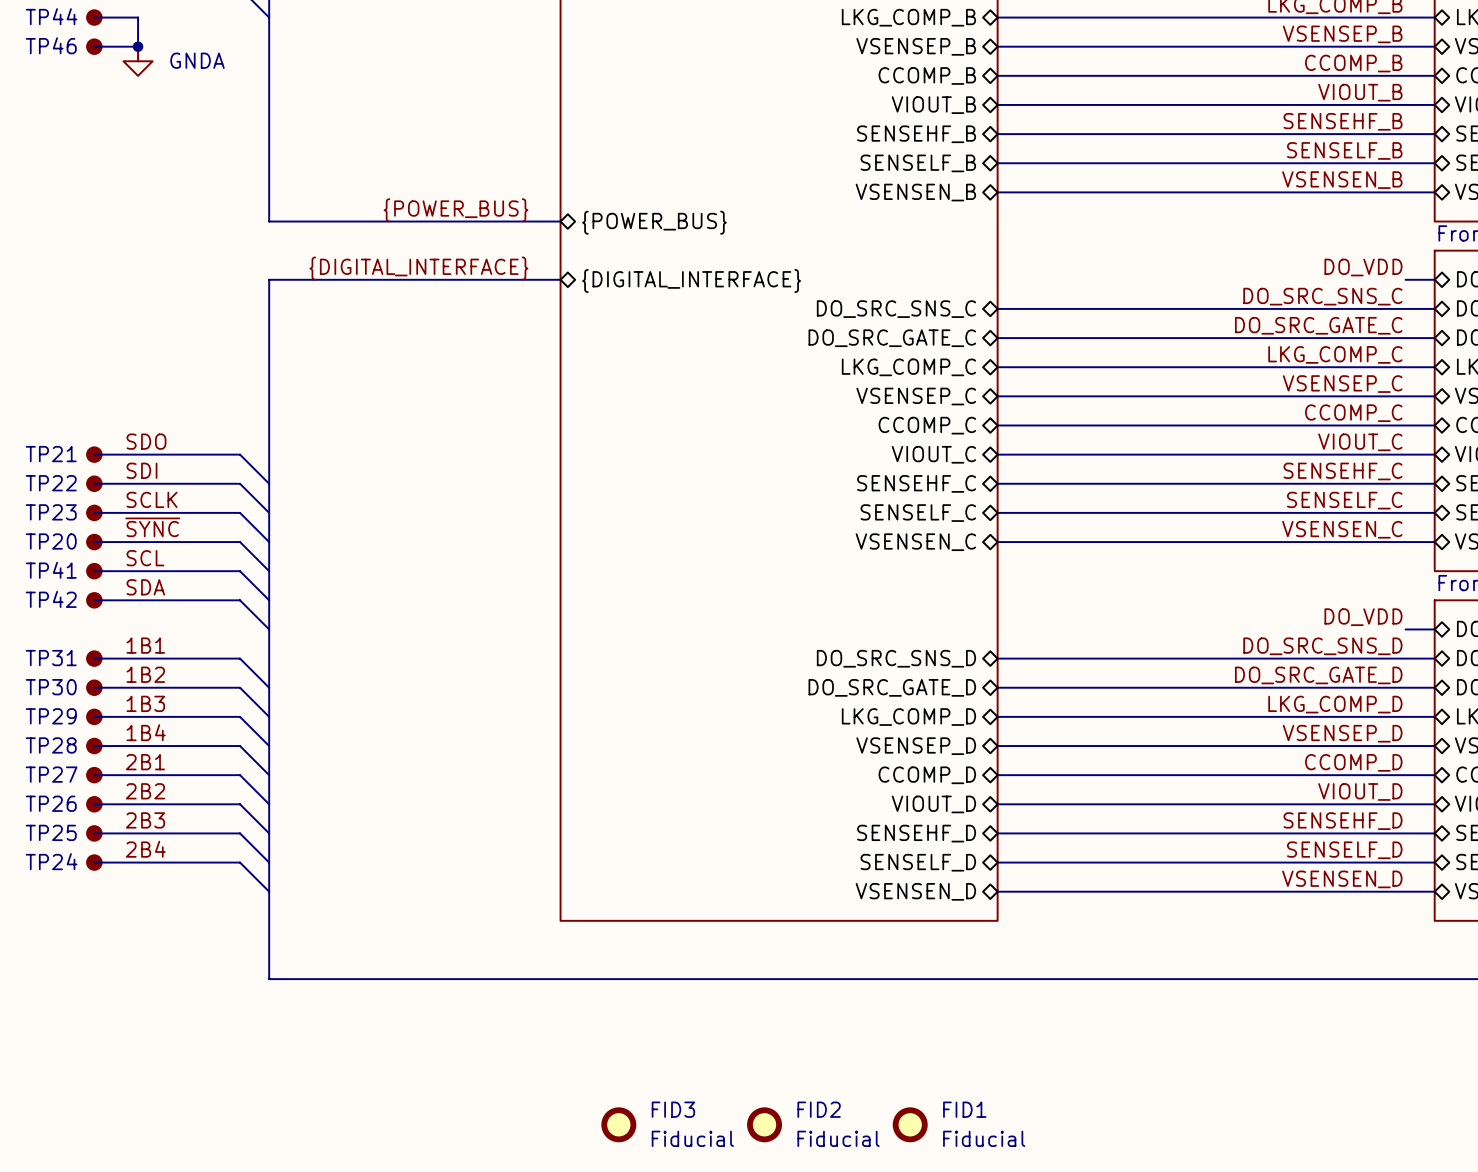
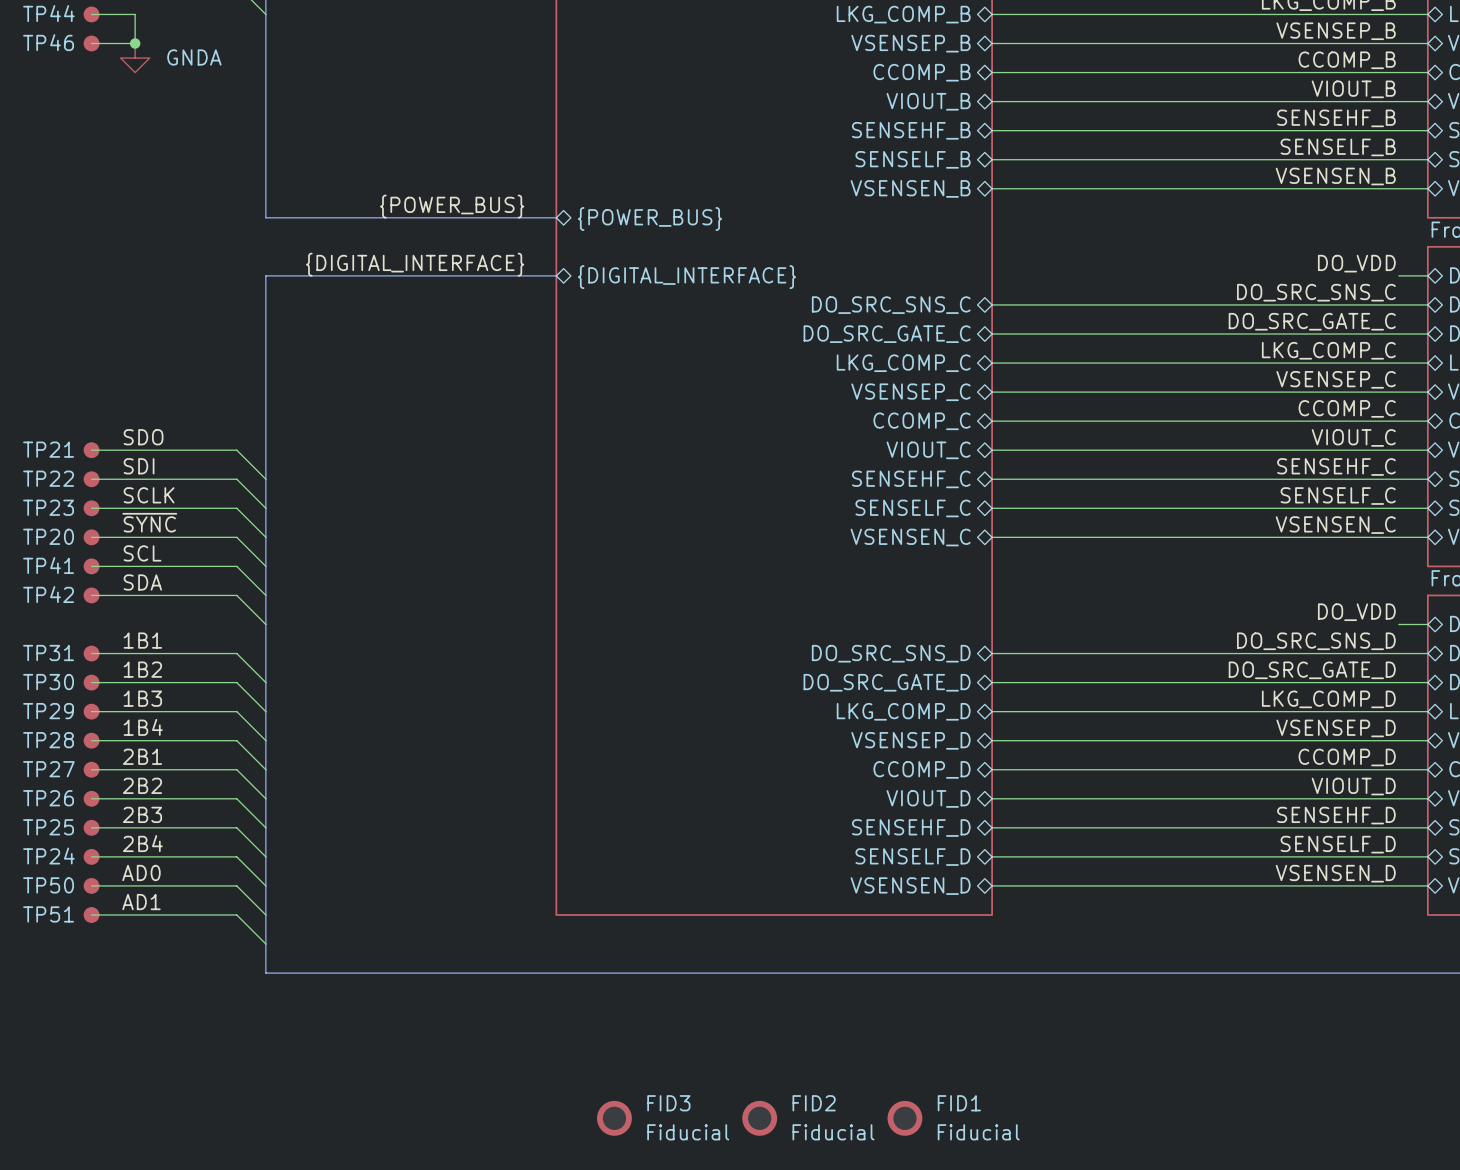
label: none -> AD0 (141, 872)
wire: none -> (91, 885) (236, 885) (265, 914)
TP50: none -> (91, 885)
label: none -> AD1 (141, 902)
wire: none -> (91, 914) (236, 914) (265, 944)
TP51: none -> (91, 914)

